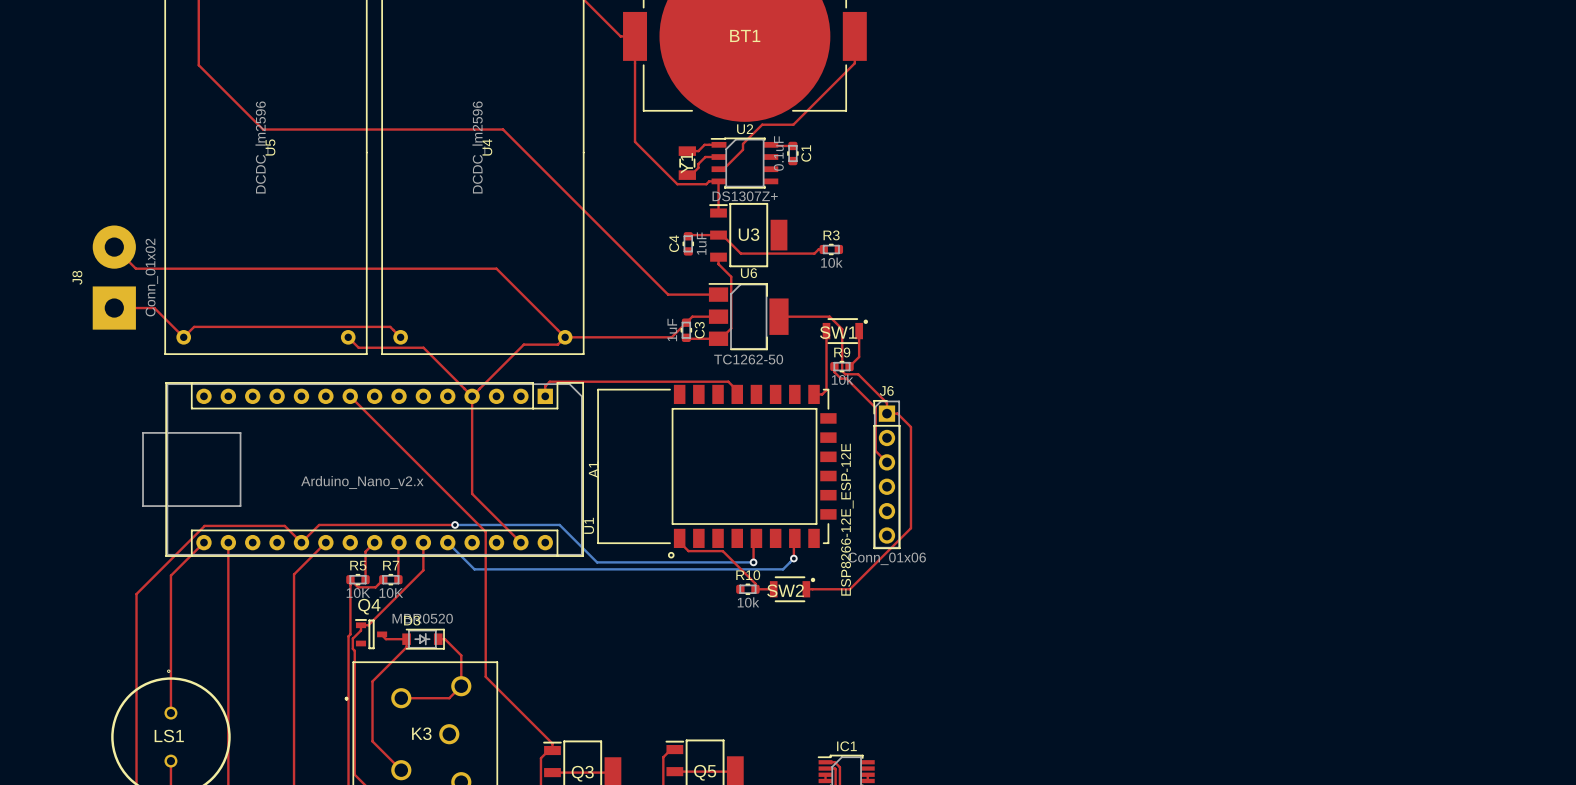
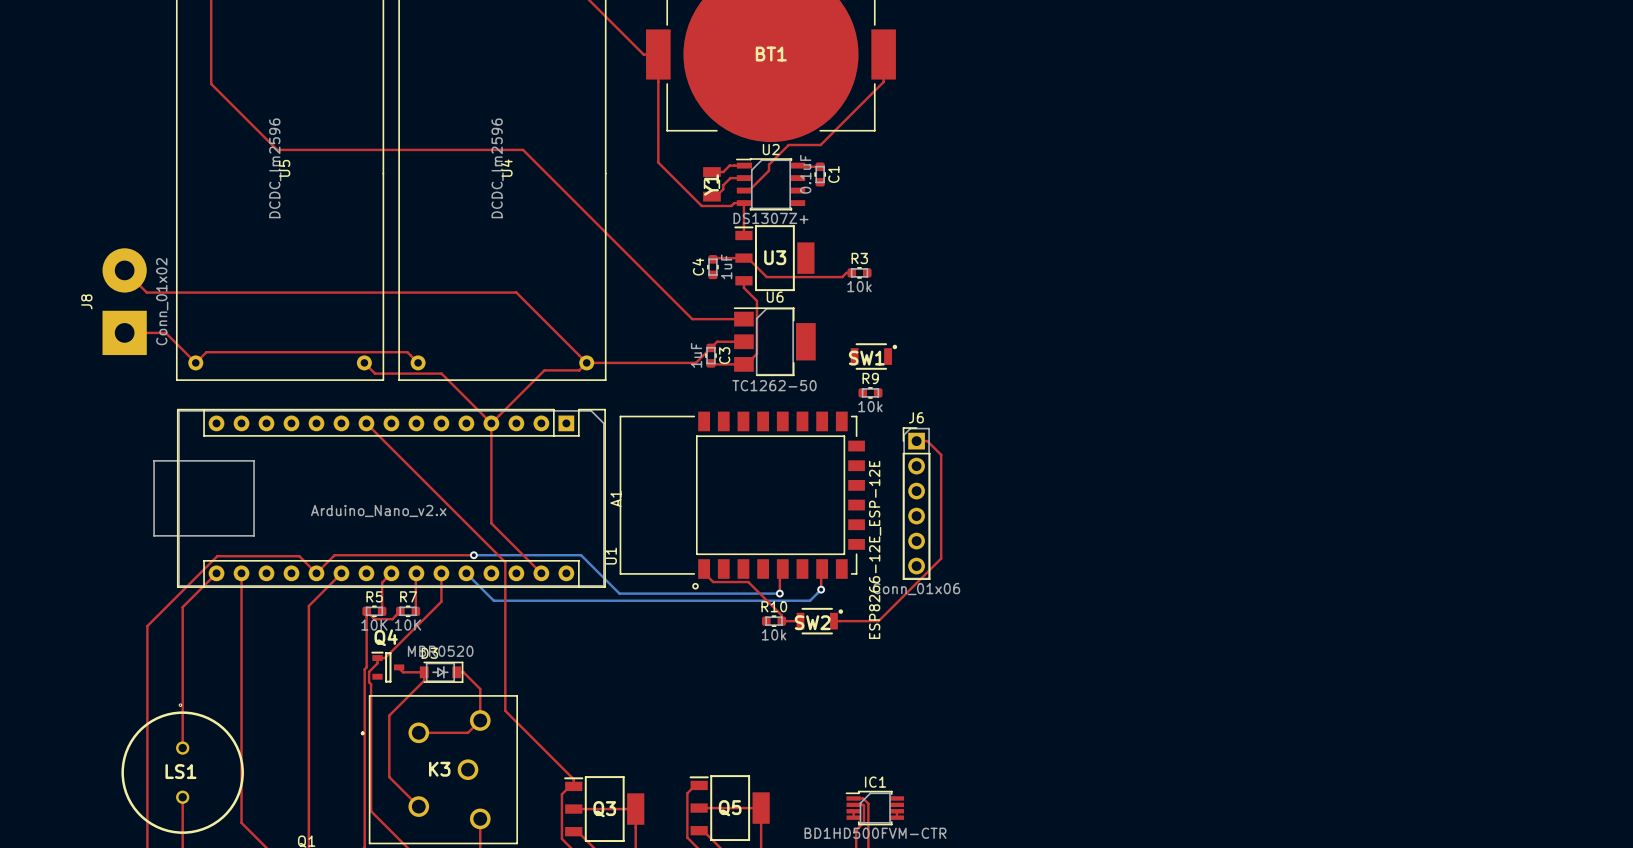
top track: (778, 316) (829, 316) (842, 329) (842, 371) (845, 374) (858, 374) (886, 403) (886, 413) -> none
top track: (826, 331) (826, 390) (822, 394) (814, 394) -> none
top track: (859, 331) (859, 356) (849, 366) -> none
top track: (834, 366) (834, 372) (840, 378) (846, 378) (875, 407) (875, 451) (886, 462) -> none
top track: (737, 394) (737, 390) (728, 381) (549, 381) (545, 386) (545, 396) -> none

